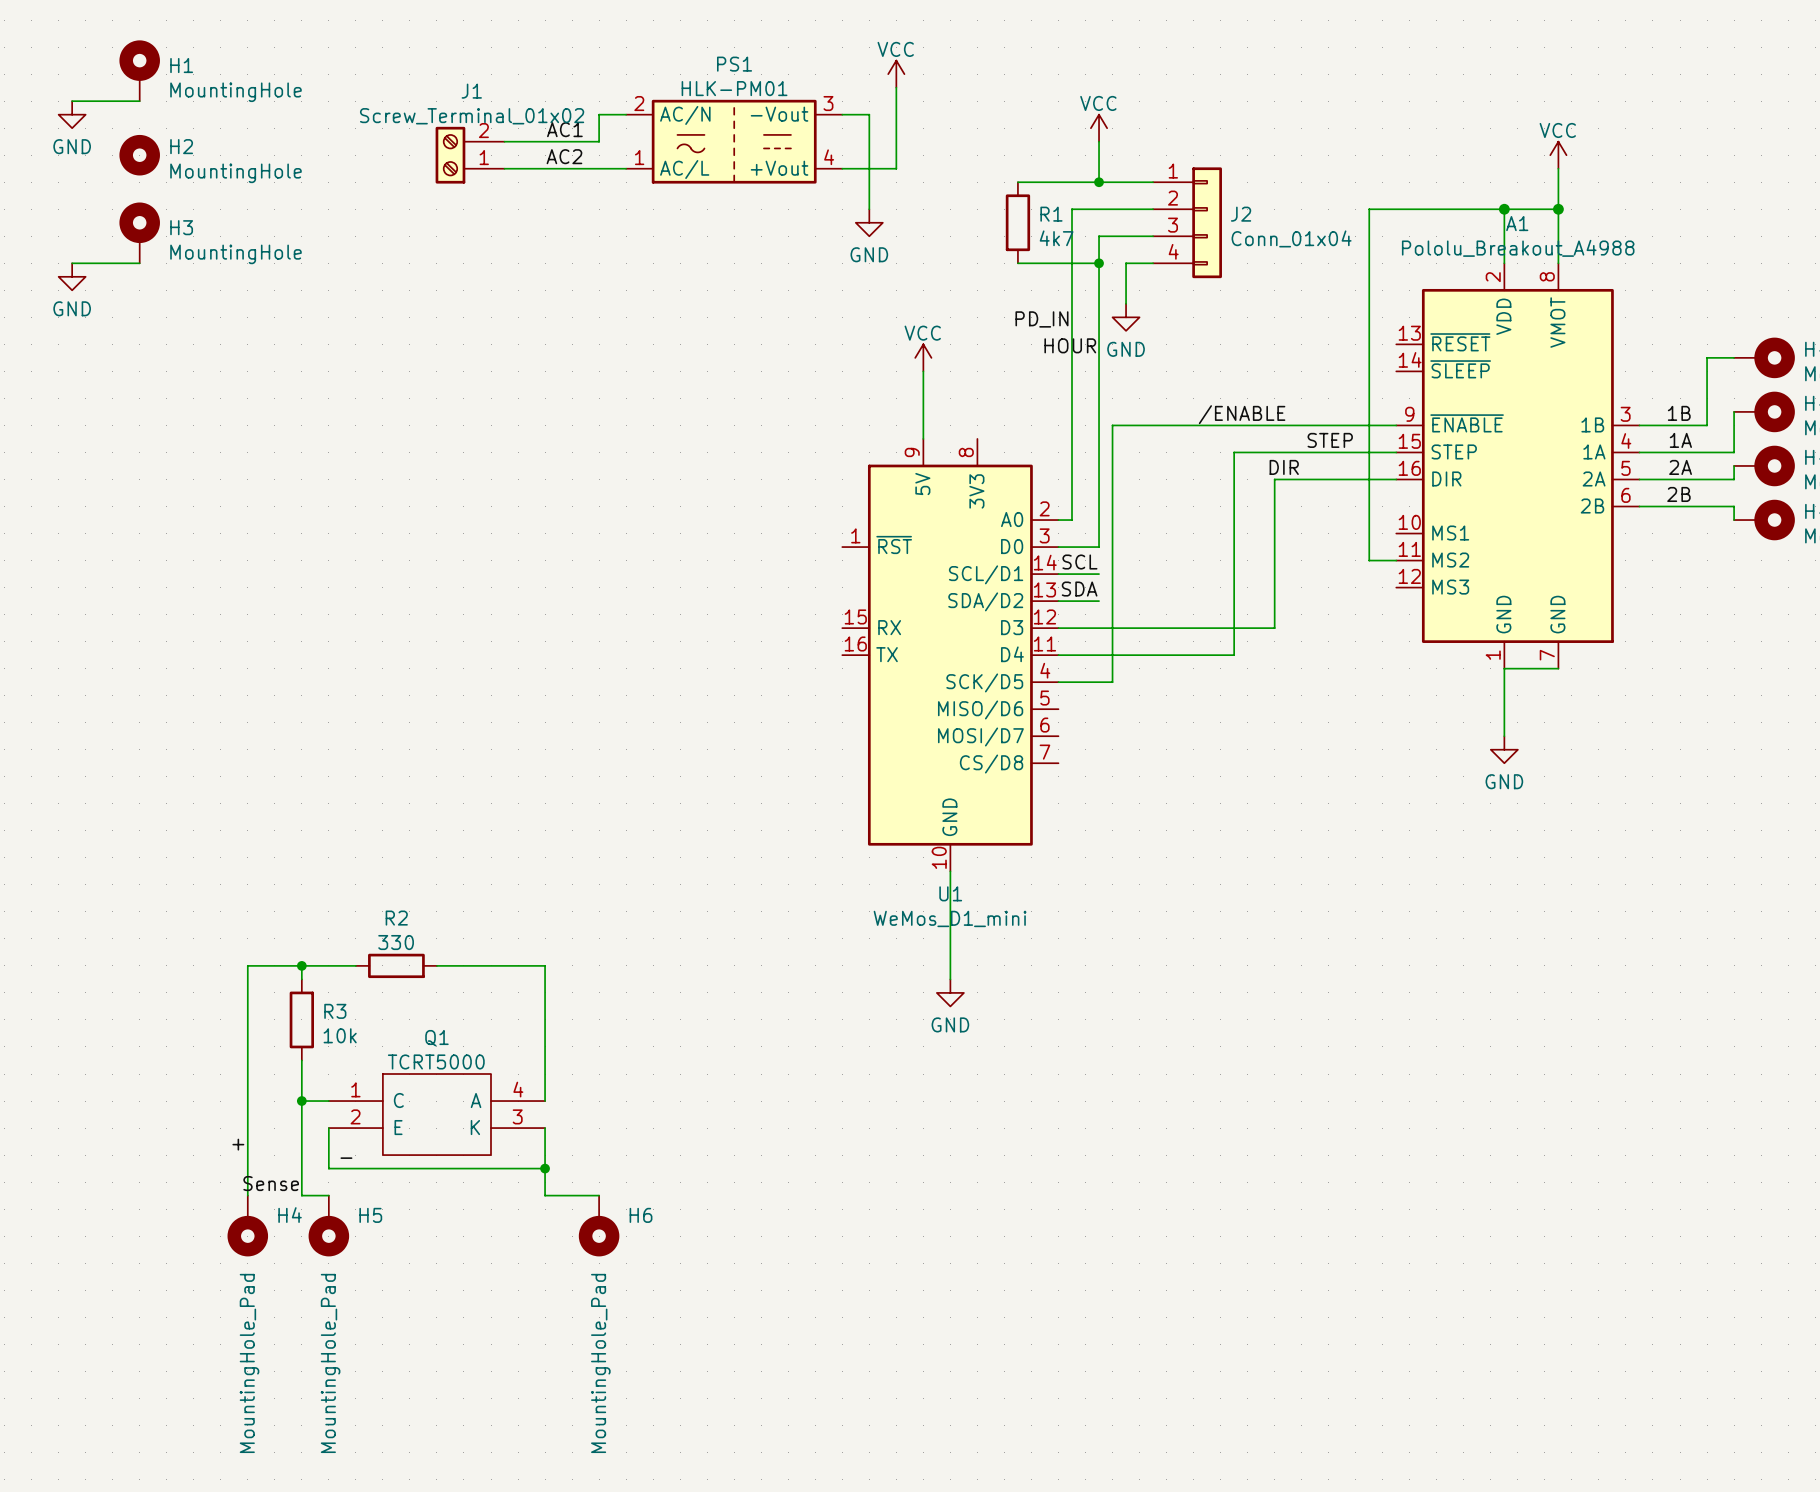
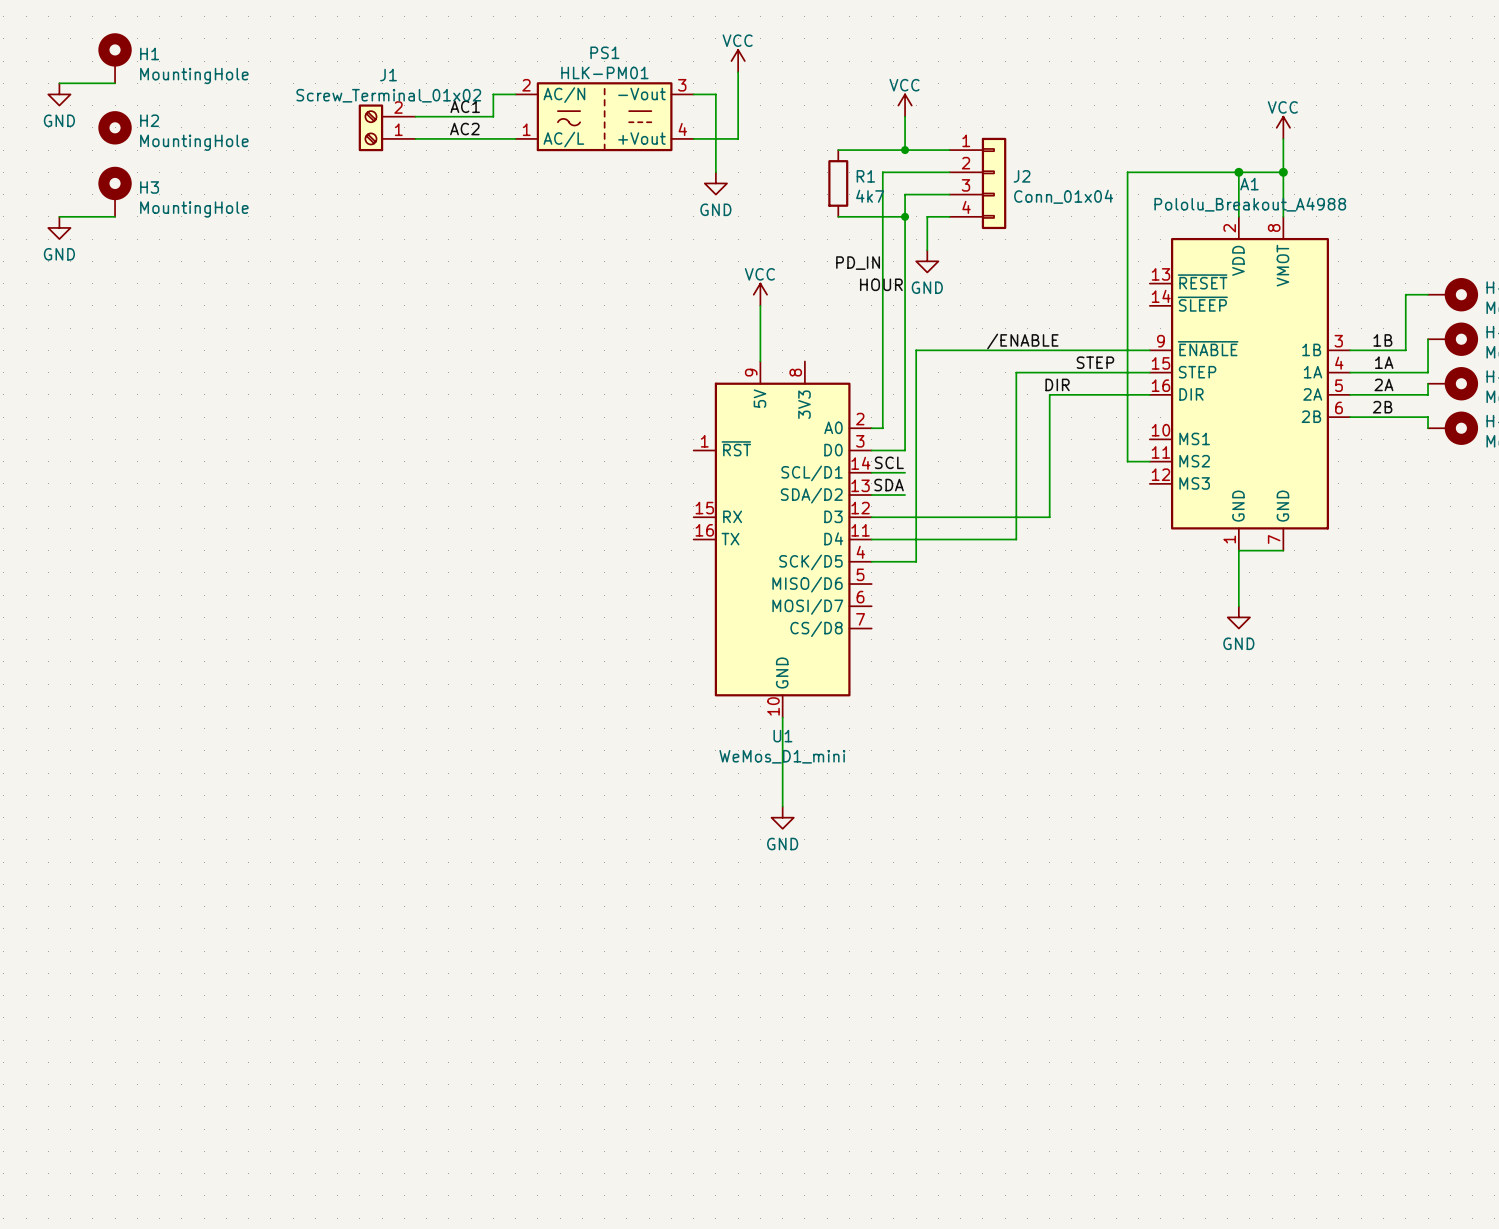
wire: (301, 965) (301, 979) -> none
junction: (301, 965) -> none
wire: (355, 965) (247, 965) (247, 1195) -> none
R2: 330 (396, 965) -> none
wire: (436, 965) (545, 965) (545, 1101) -> none
R3: 10k (301, 1019) -> none
wire: (301, 1060) (301, 1195) (328, 1195) -> none
wire: (301, 1101) (328, 1101) -> none
junction: (301, 1101) -> none
Q1: TCRT5000 (436, 1114) -> none
wire: (328, 1128) (328, 1168) (545, 1168) -> none
wire: (545, 1128) (545, 1195) (599, 1195) -> none
label: + (238, 1144) -> none
label: - (346, 1158) -> none
junction: (545, 1168) -> none
label: Sense (271, 1183) -> none
H4: MountingHole_Pad (247, 1226) -> none
H5: MountingHole_Pad (328, 1226) -> none
H6: MountingHole_Pad (599, 1226) -> none

